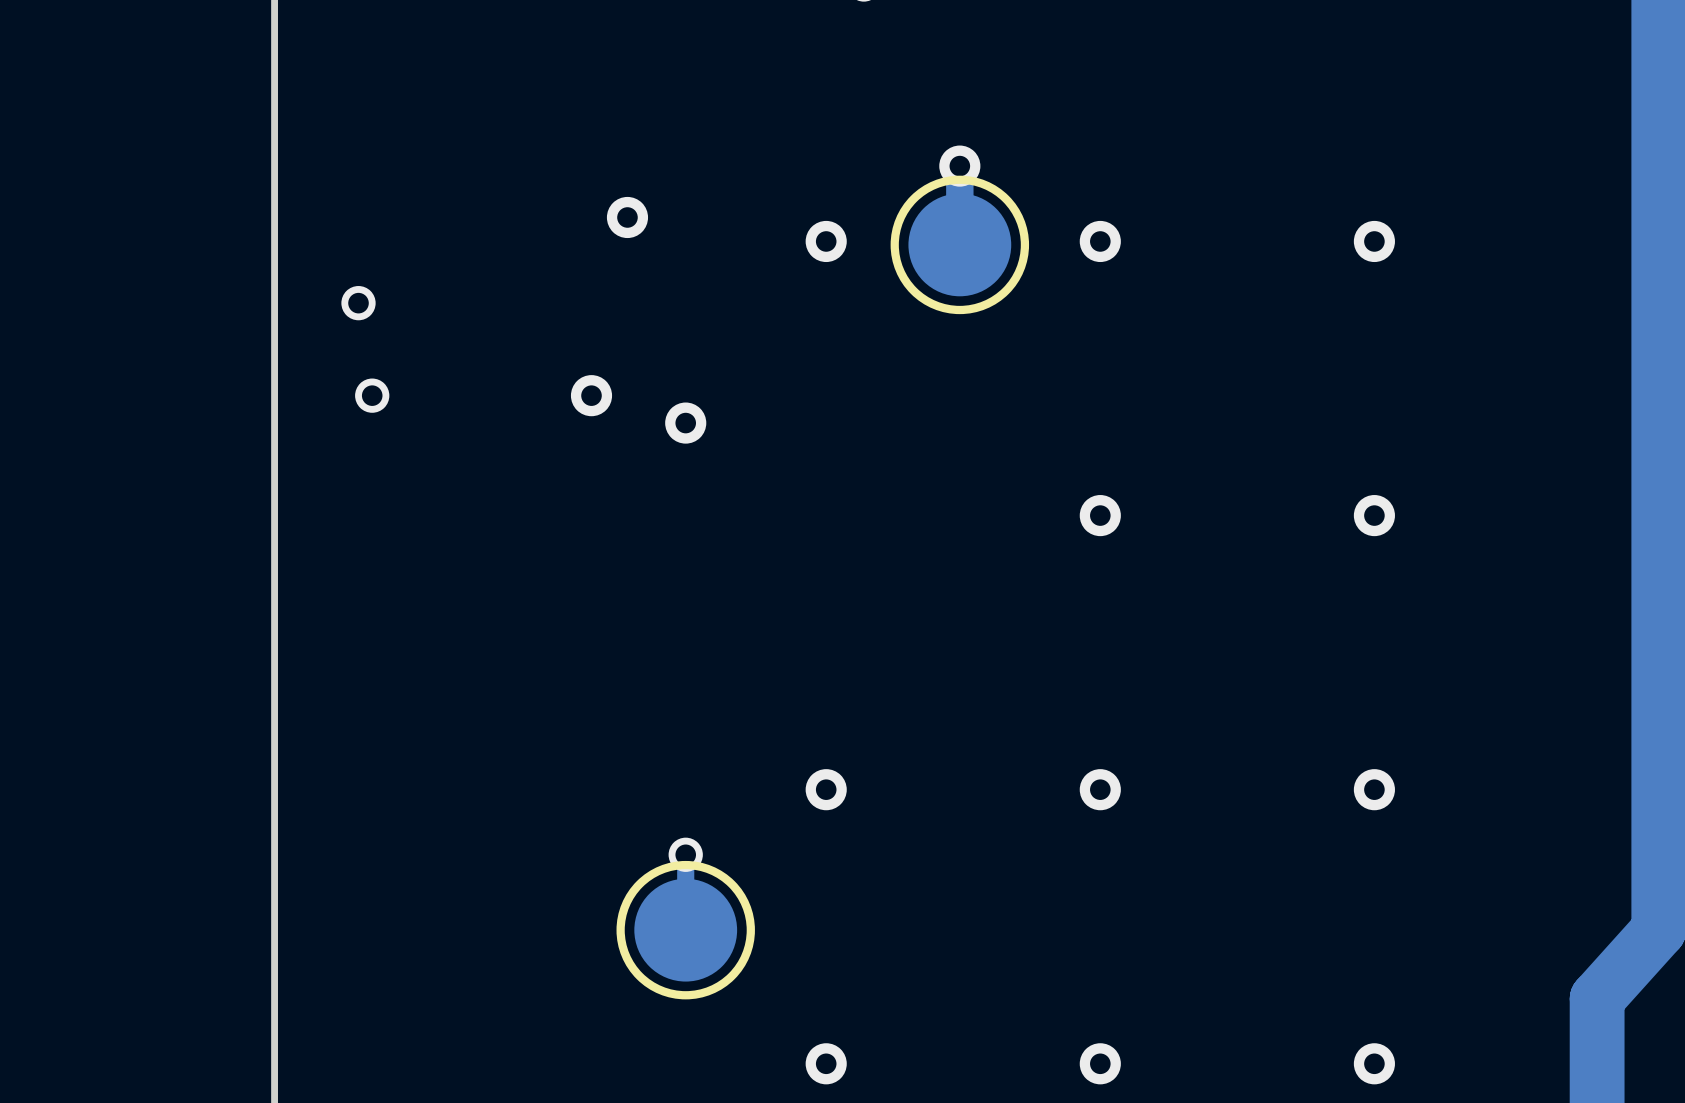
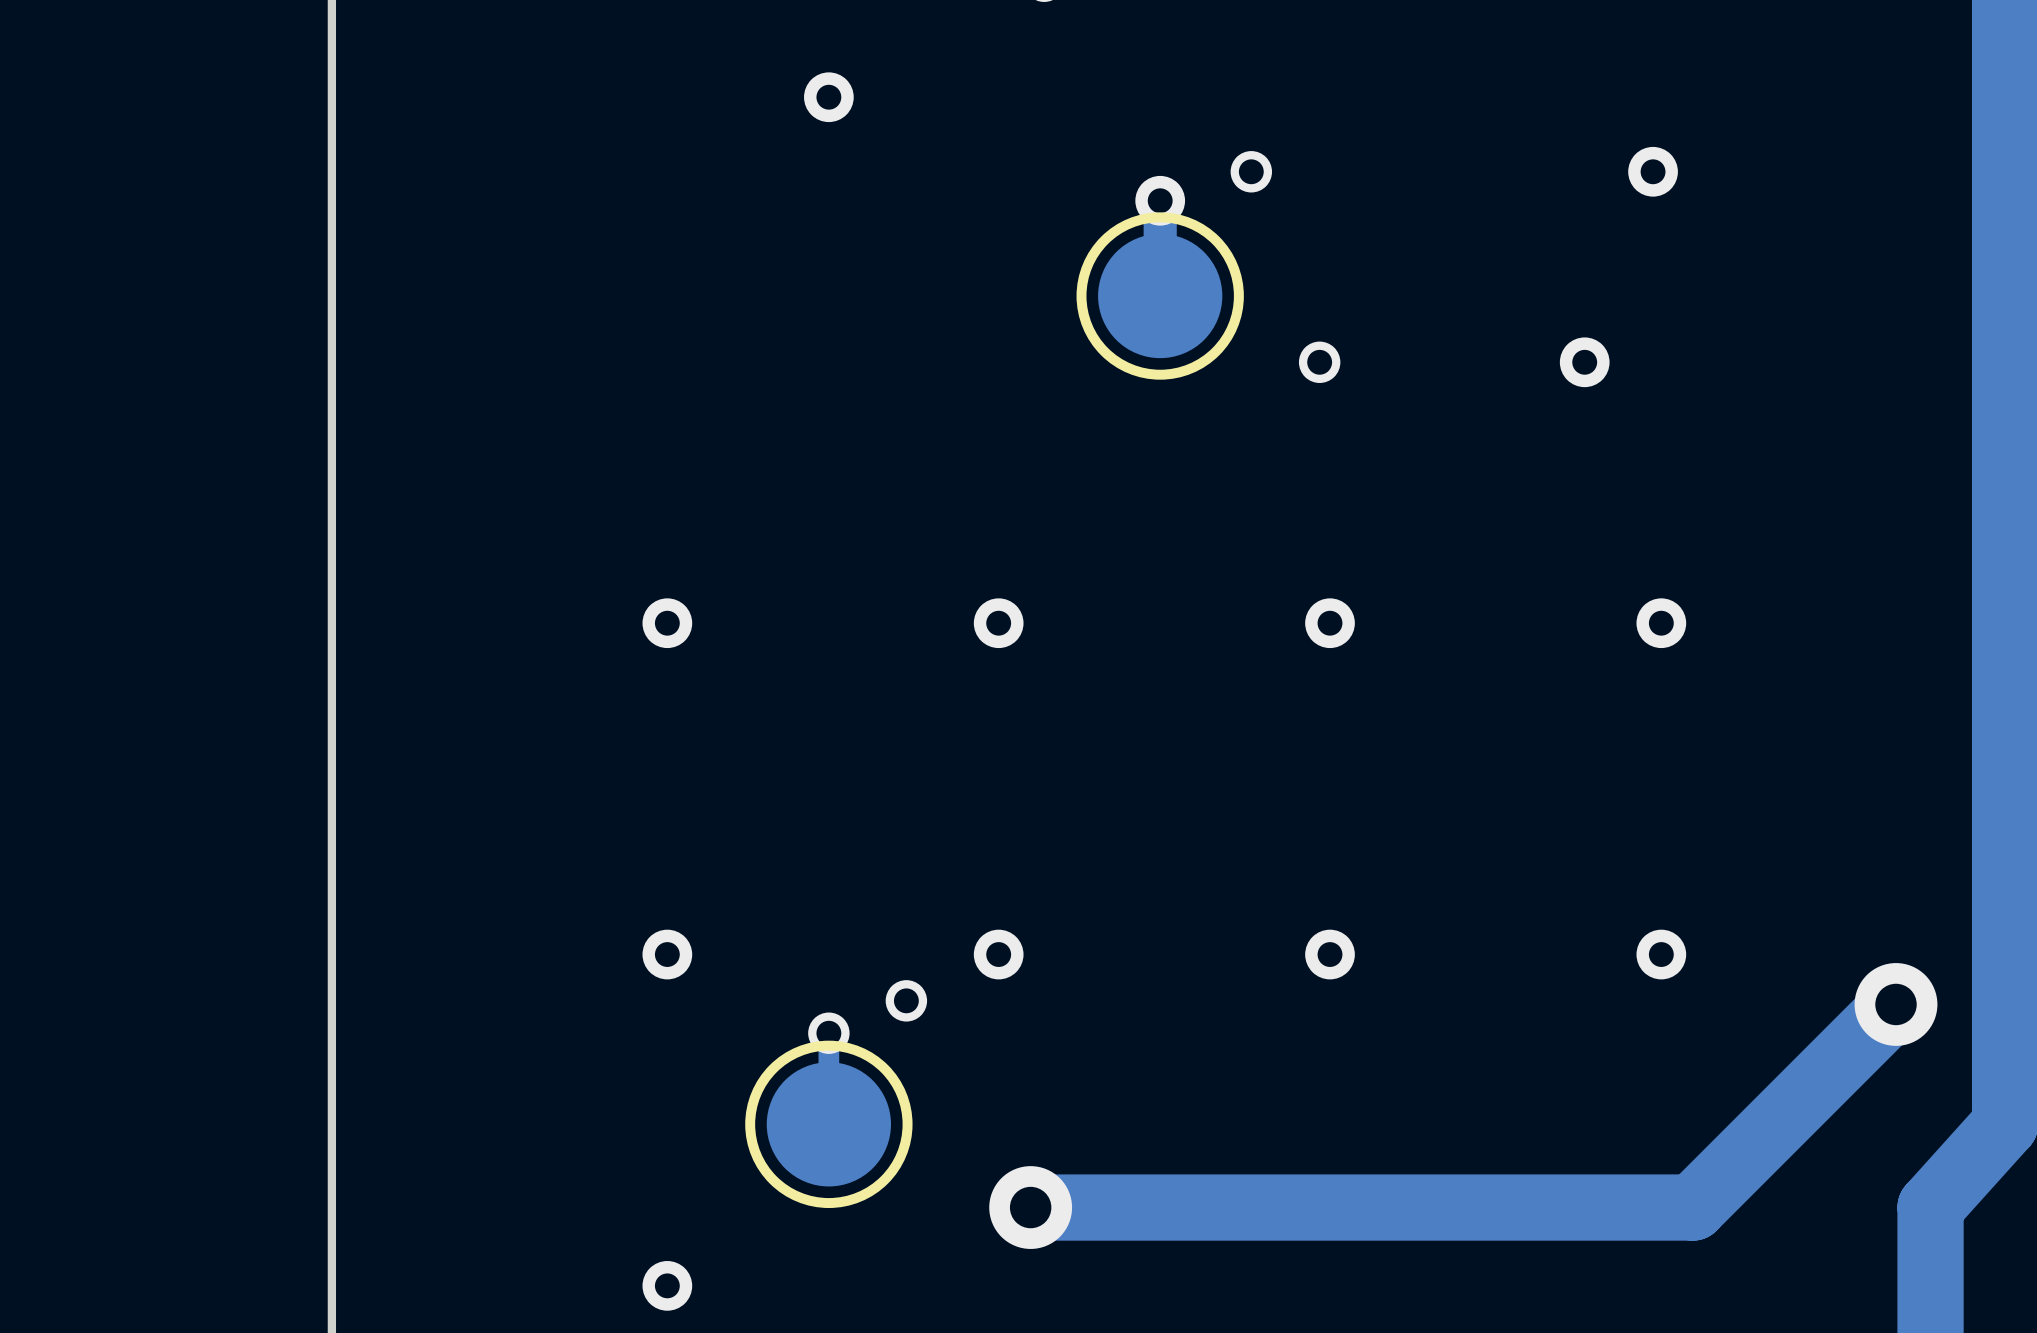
via: none -> (828, 97)
via: none -> (1251, 171)
via: none -> (1653, 171)
via: (627, 217) -> none
via: (826, 241) -> none
via: (1100, 241) -> none
via: (1374, 241) -> none
via: none -> (1319, 362)
via: none -> (1584, 362)
via: (358, 303) -> none
via: (372, 395) -> none
via: (591, 395) -> none
via: (685, 423) -> none
via: none -> (667, 623)
via: none -> (998, 623)
via: none -> (667, 954)
via: none -> (906, 1000)
track: none -> (1896, 1004) (1692, 1207) (1030, 1207)
via: none -> (1896, 1004)
via: none -> (1030, 1207)
via: none -> (667, 1285)
via: (826, 1063) -> none
via: (1100, 1063) -> none
via: (1374, 1063) -> none

